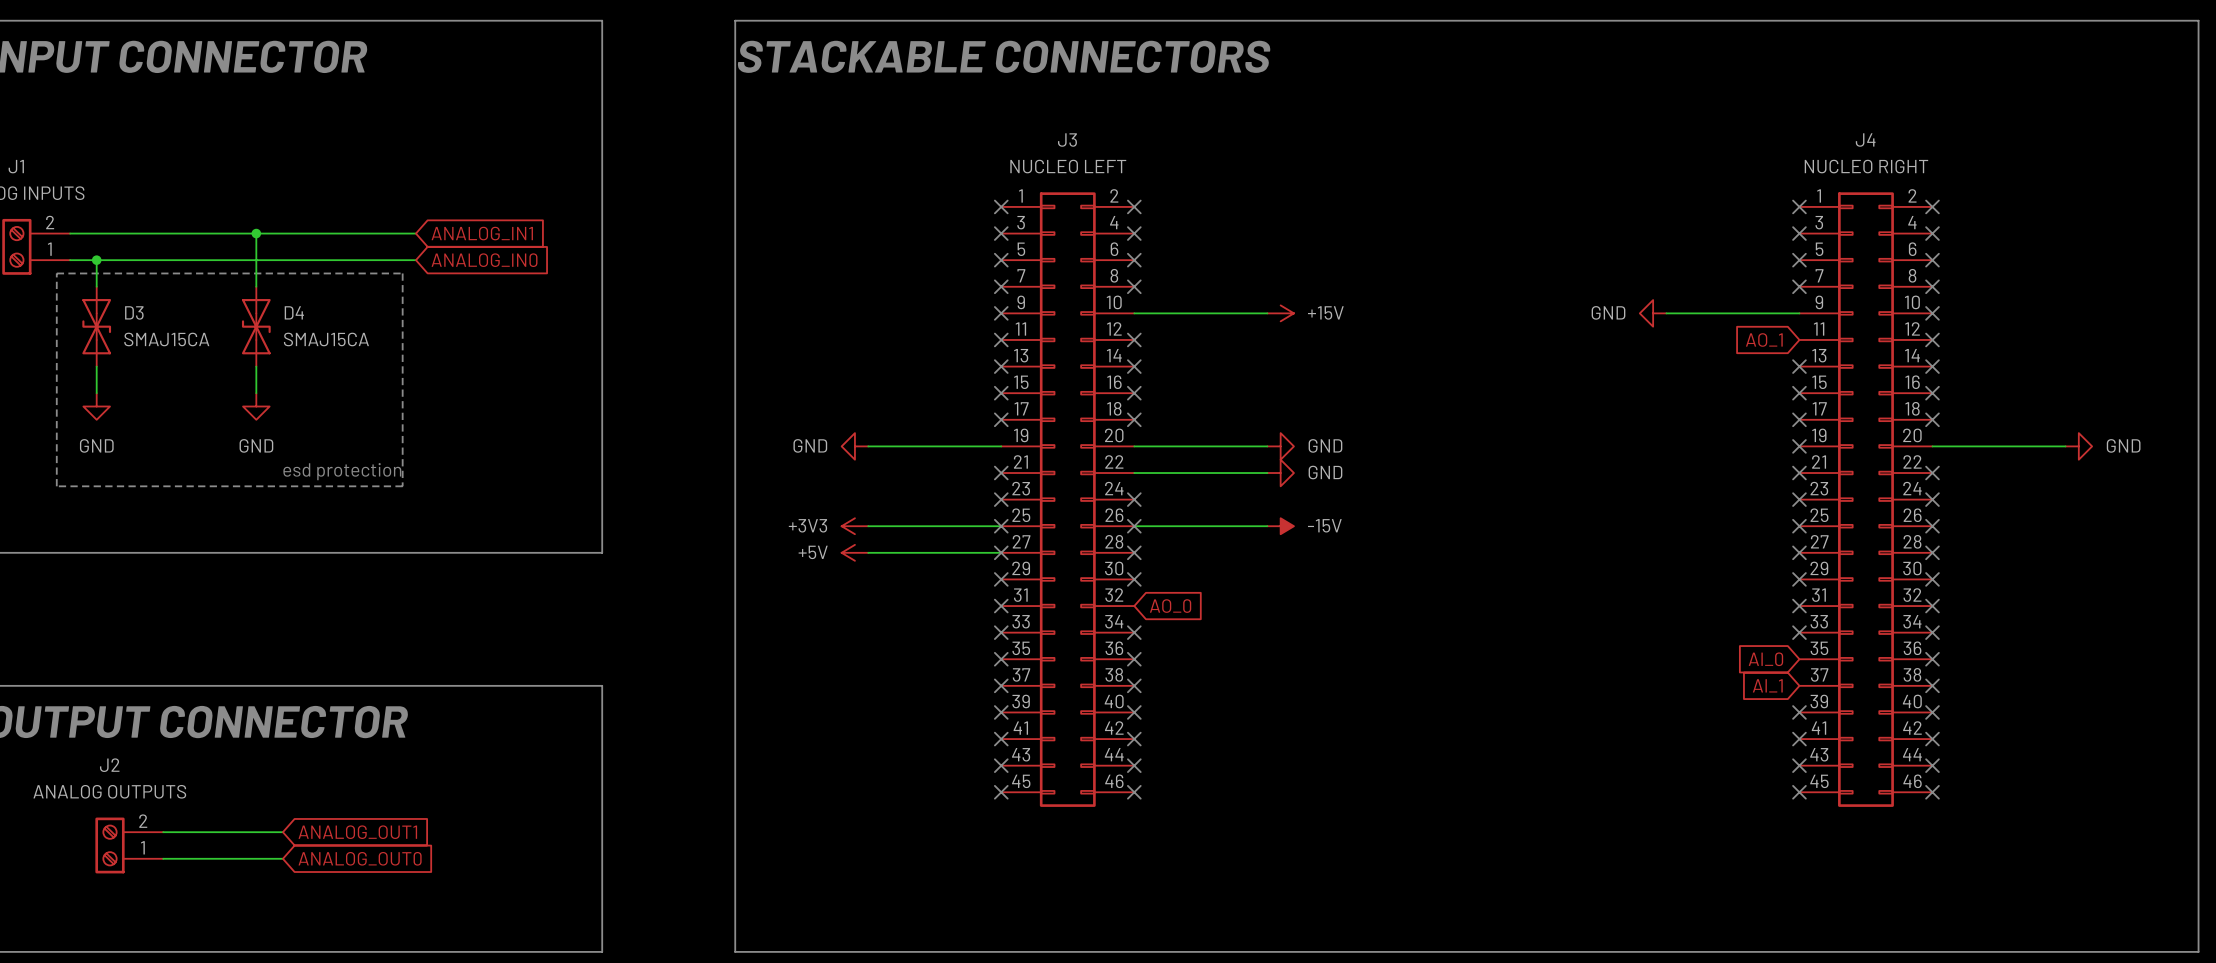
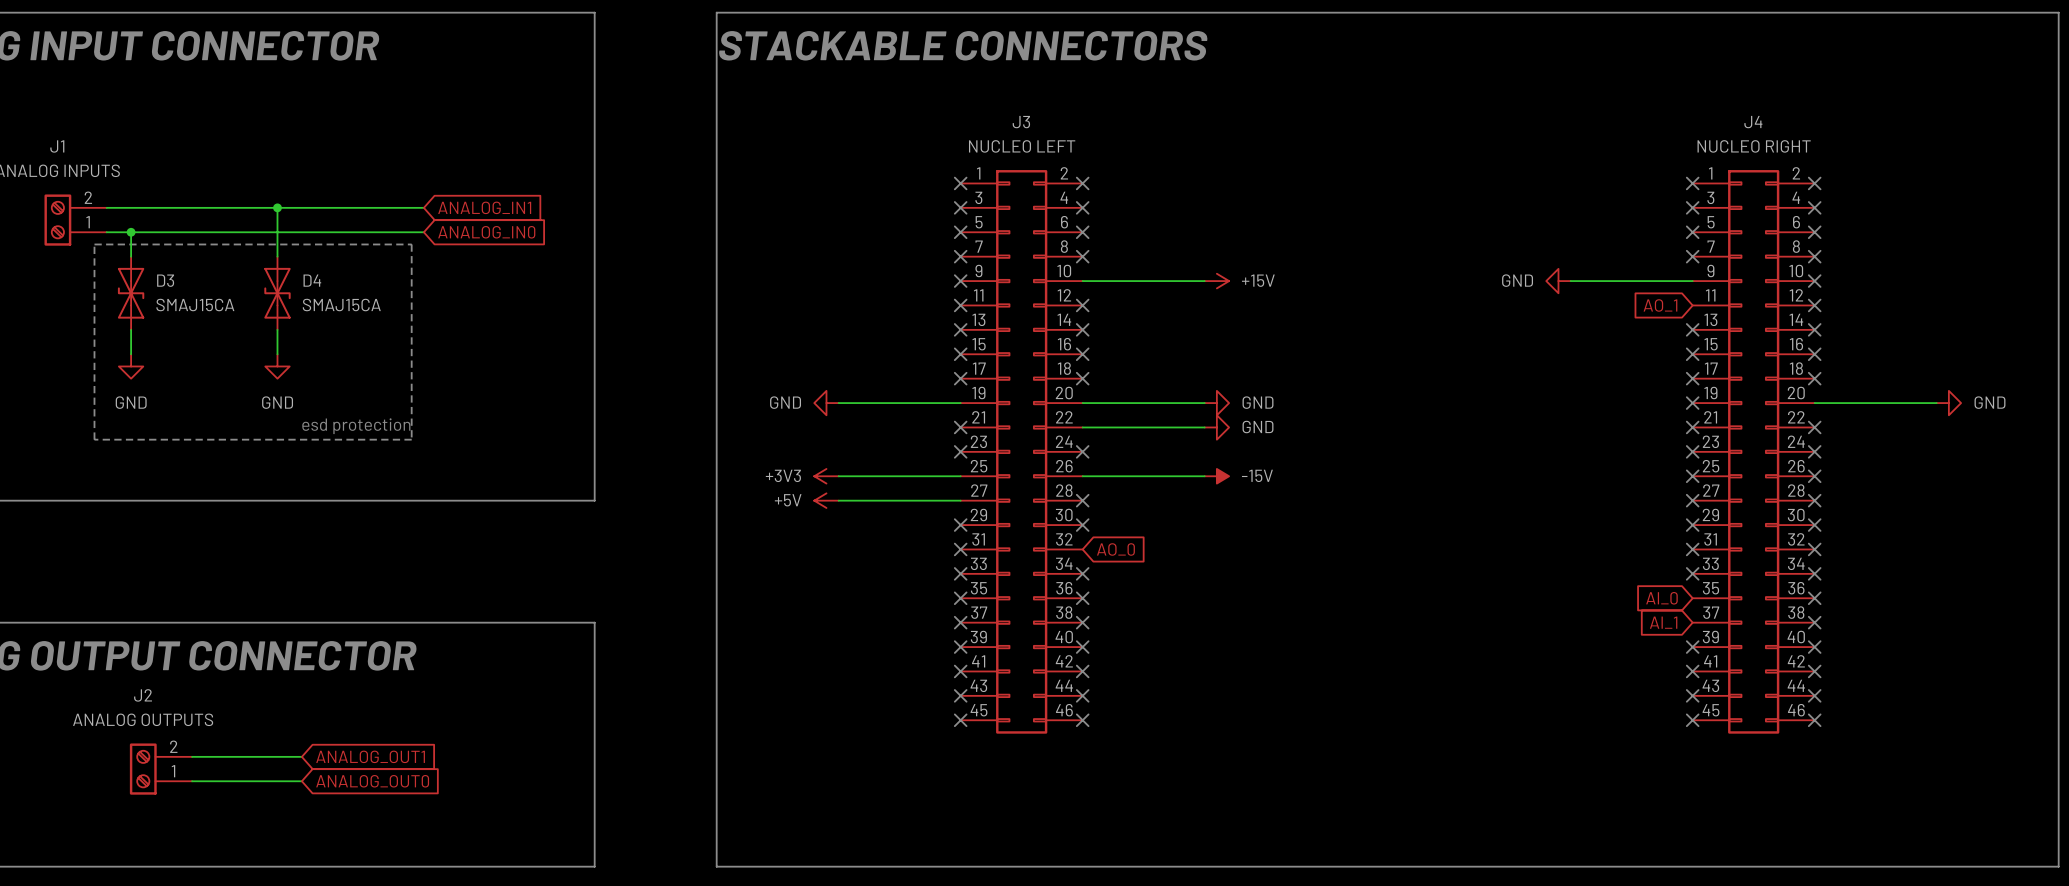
no-connect mark: (1001, 526) -> none
no-connect mark: (1134, 526) -> none
no-connect mark: (1001, 552) -> none

